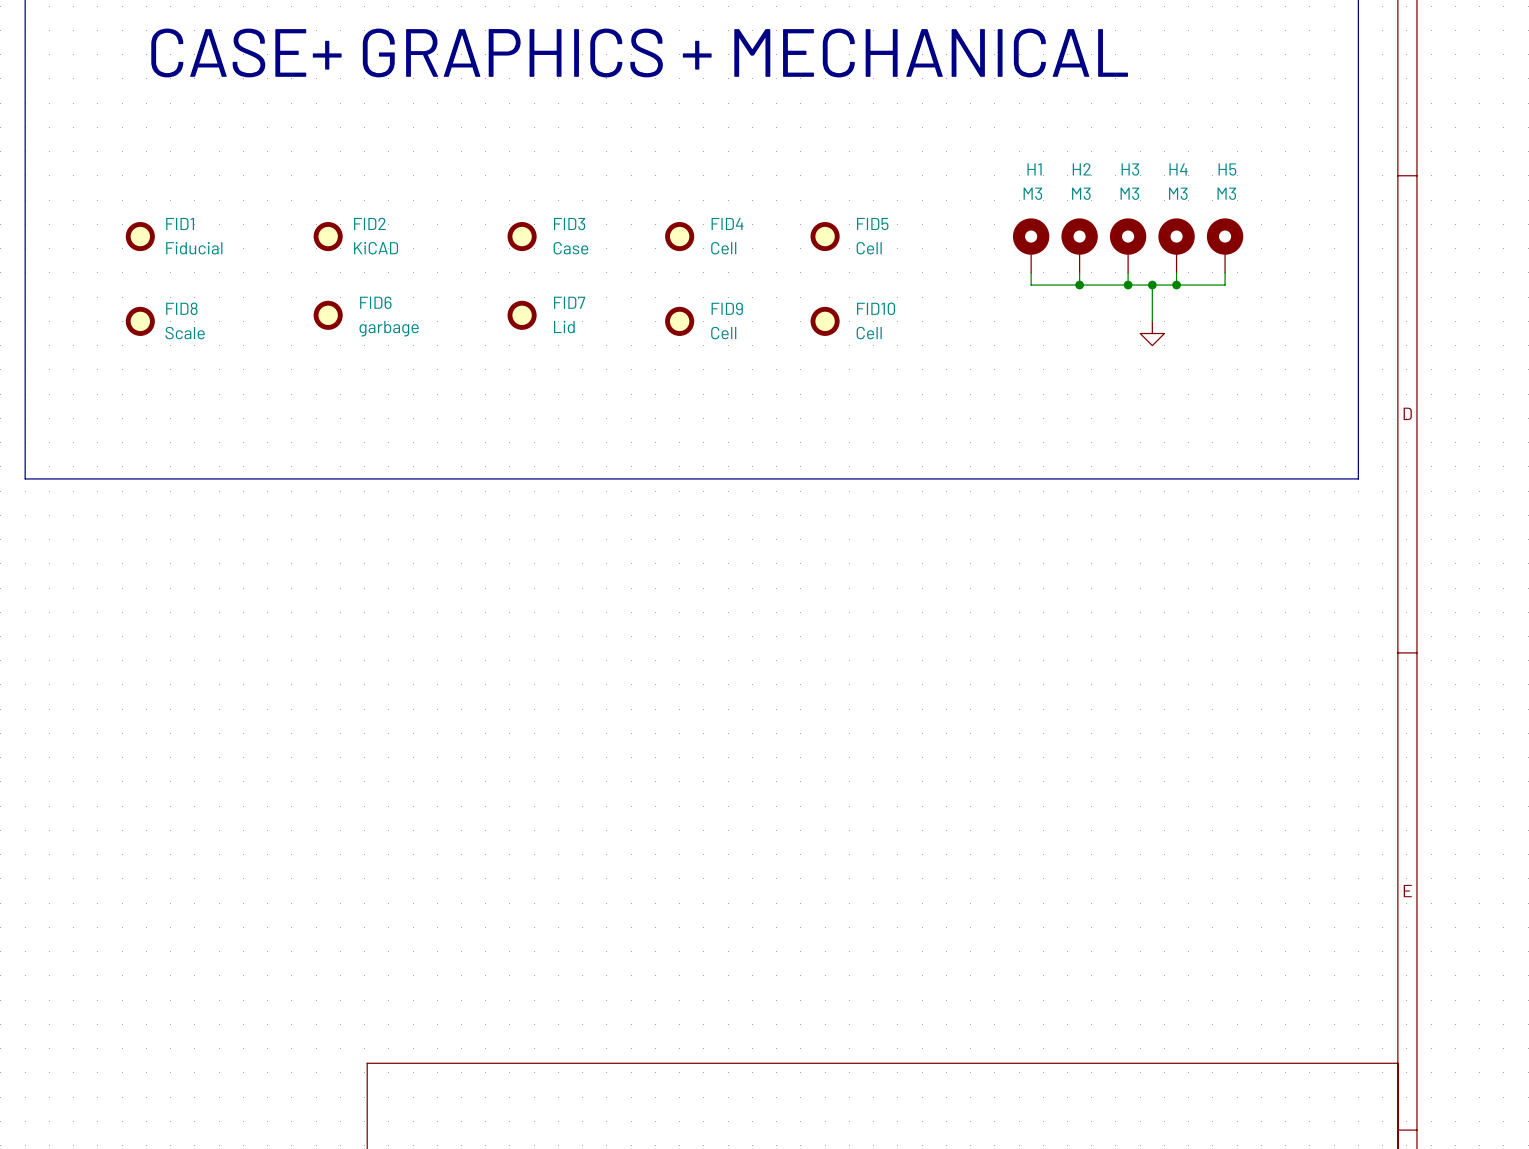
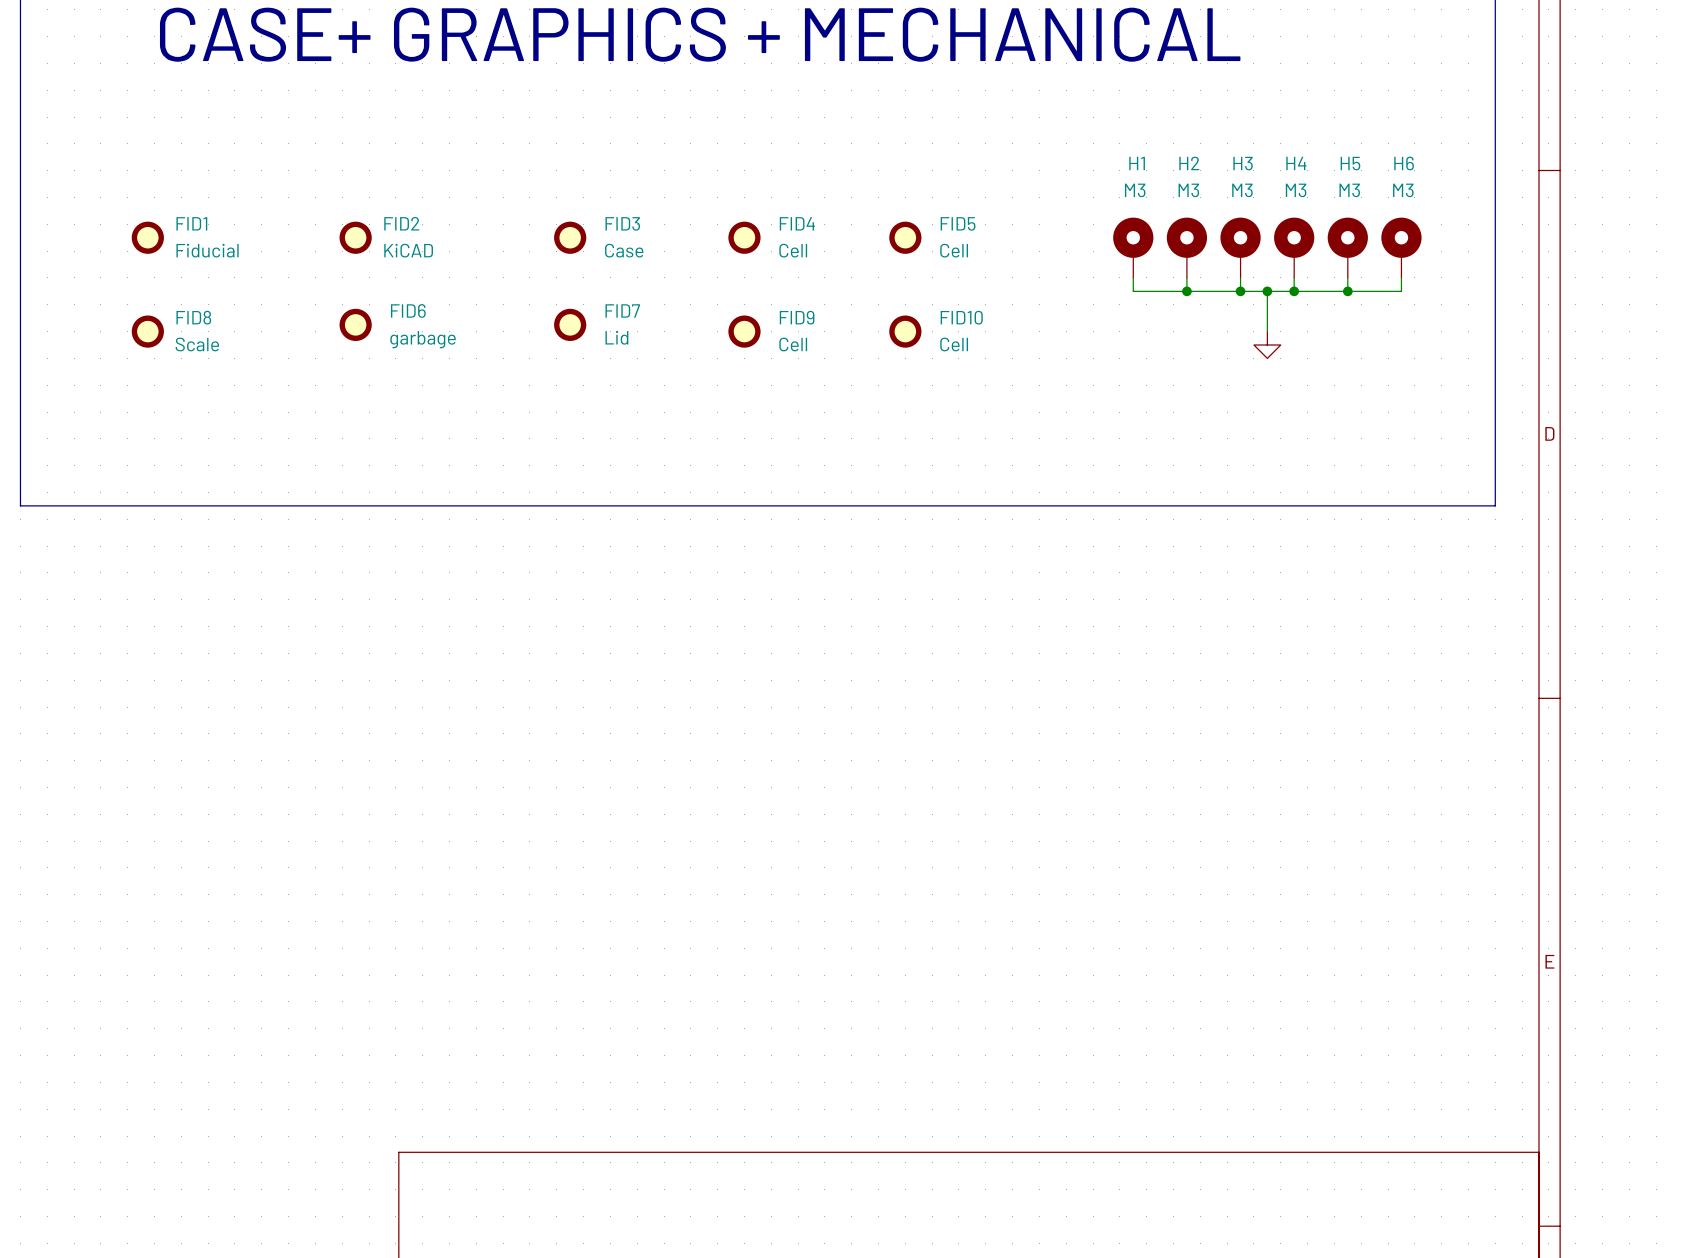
H6: none -> M3 (1401, 247)
wire: none -> (1401, 277) (1401, 291) (1347, 291)
junction: none -> (1347, 291)

